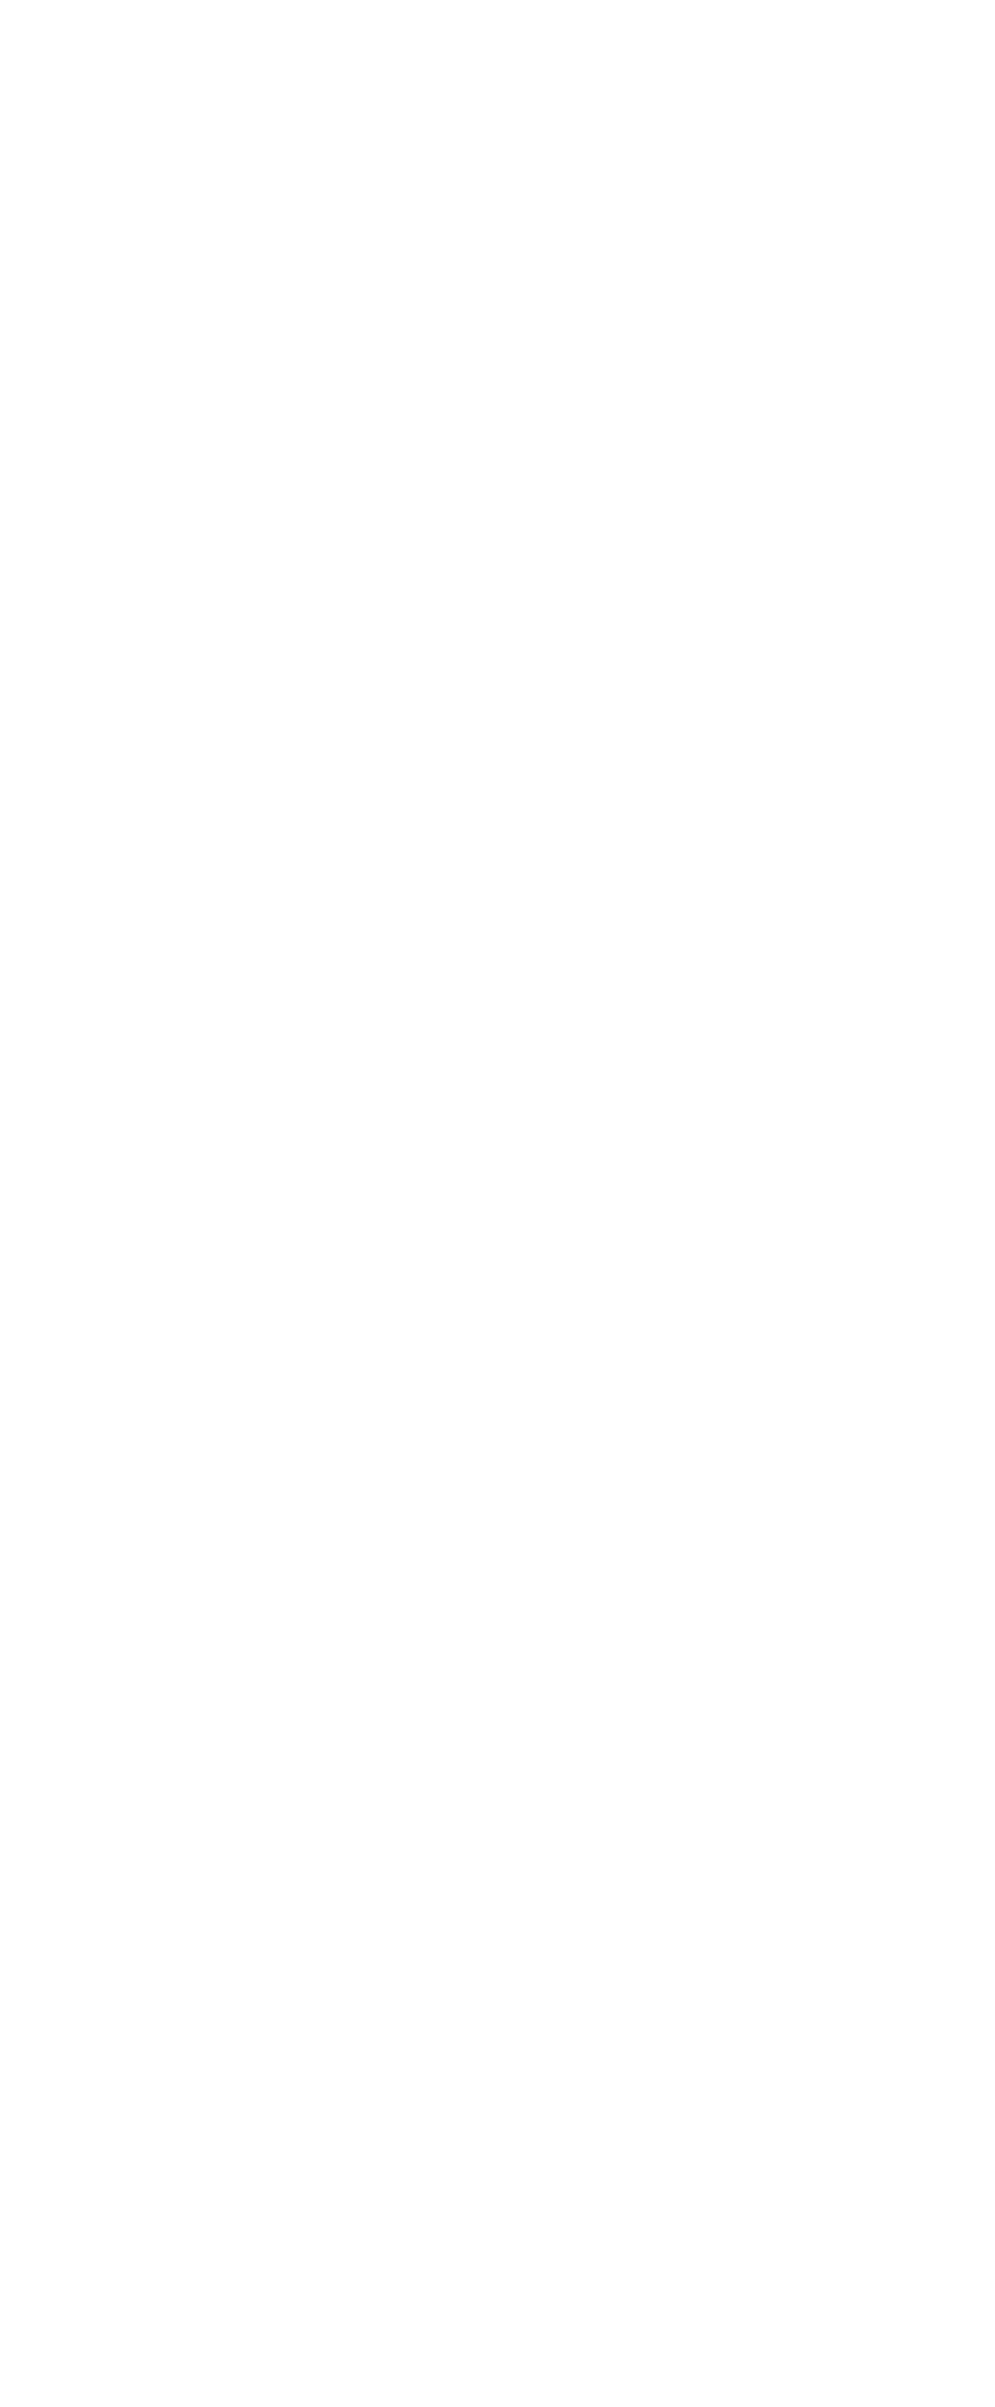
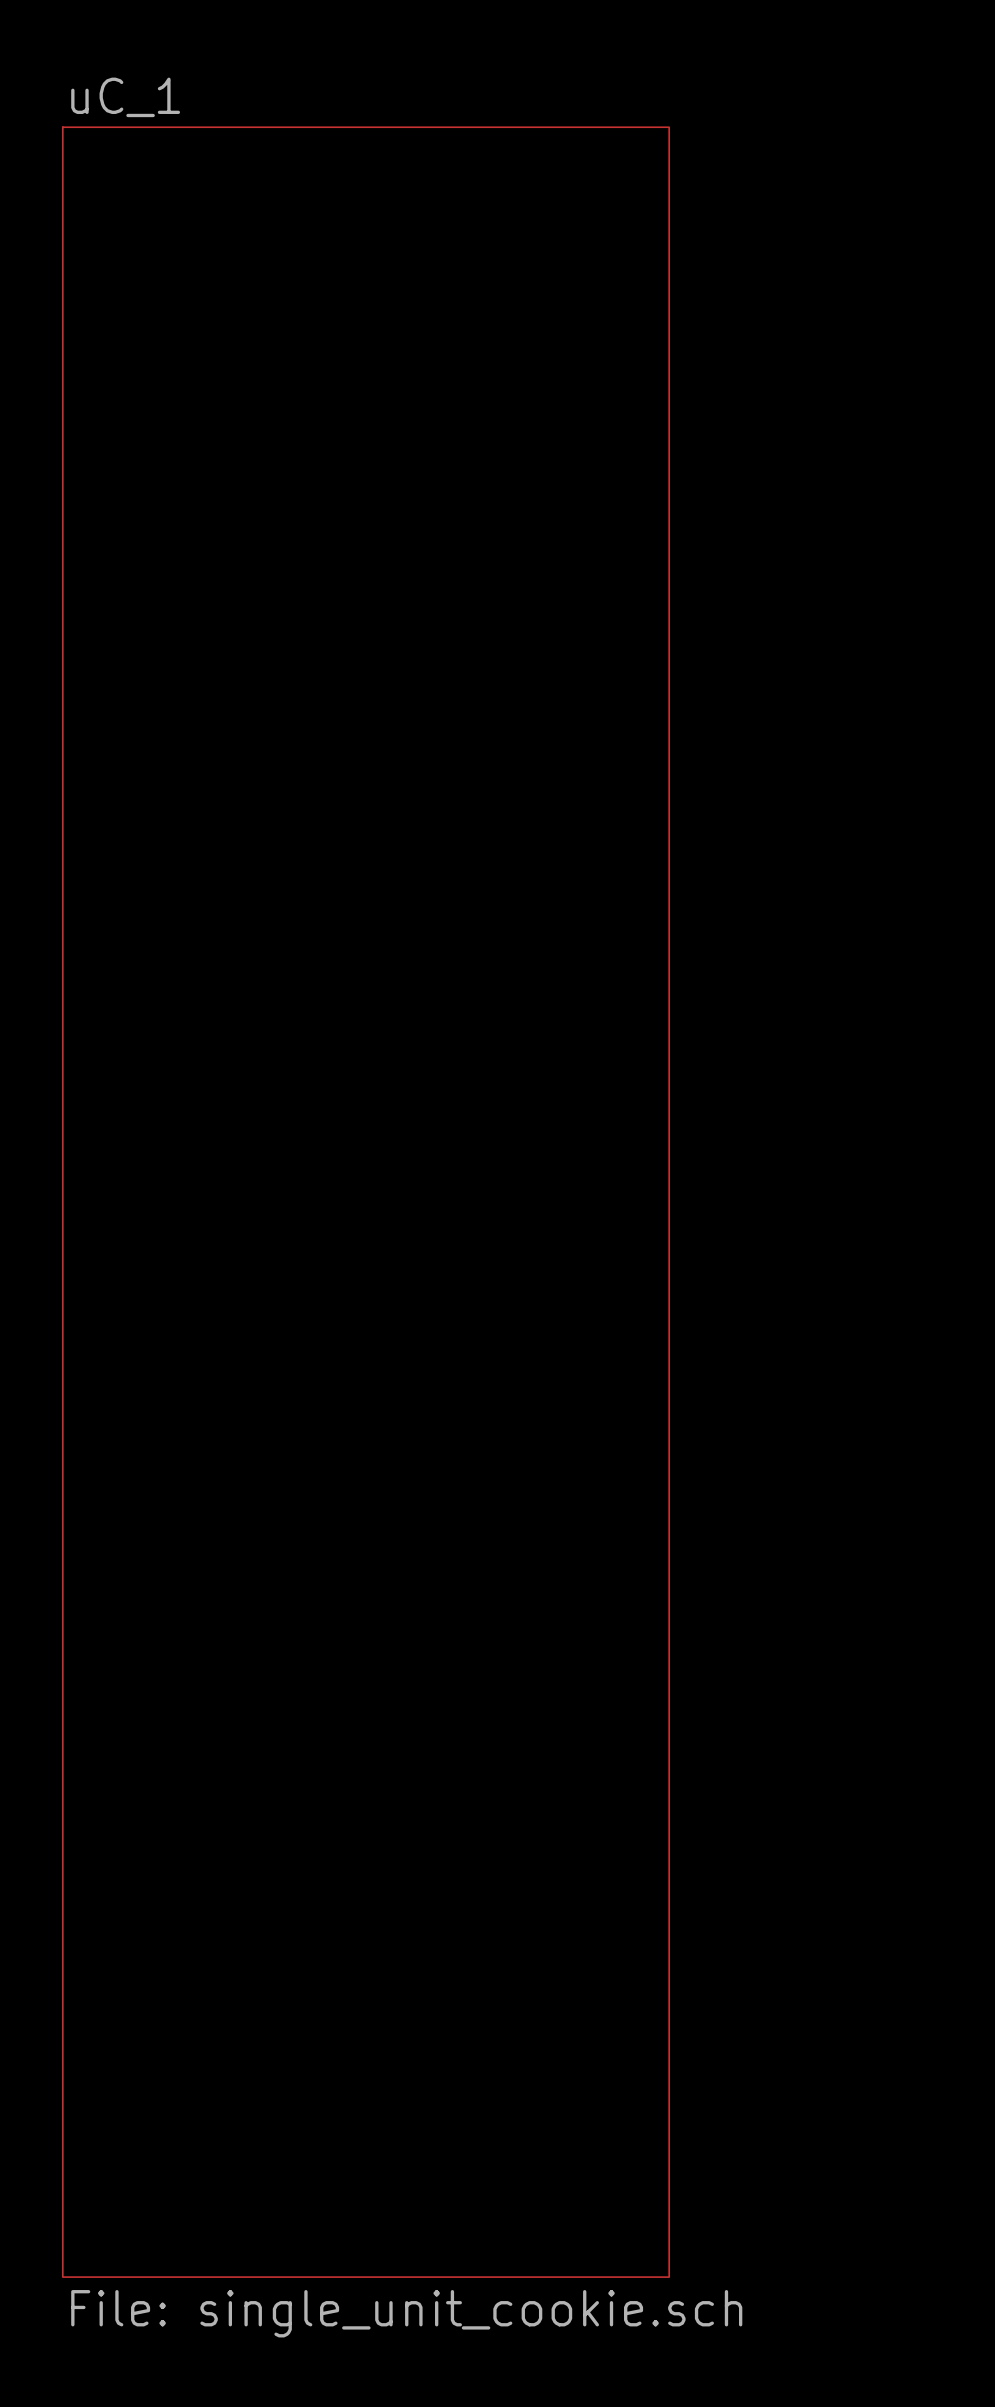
sheet uC_1: none -> File: single_unit_cookie.sch (365, 1202)

